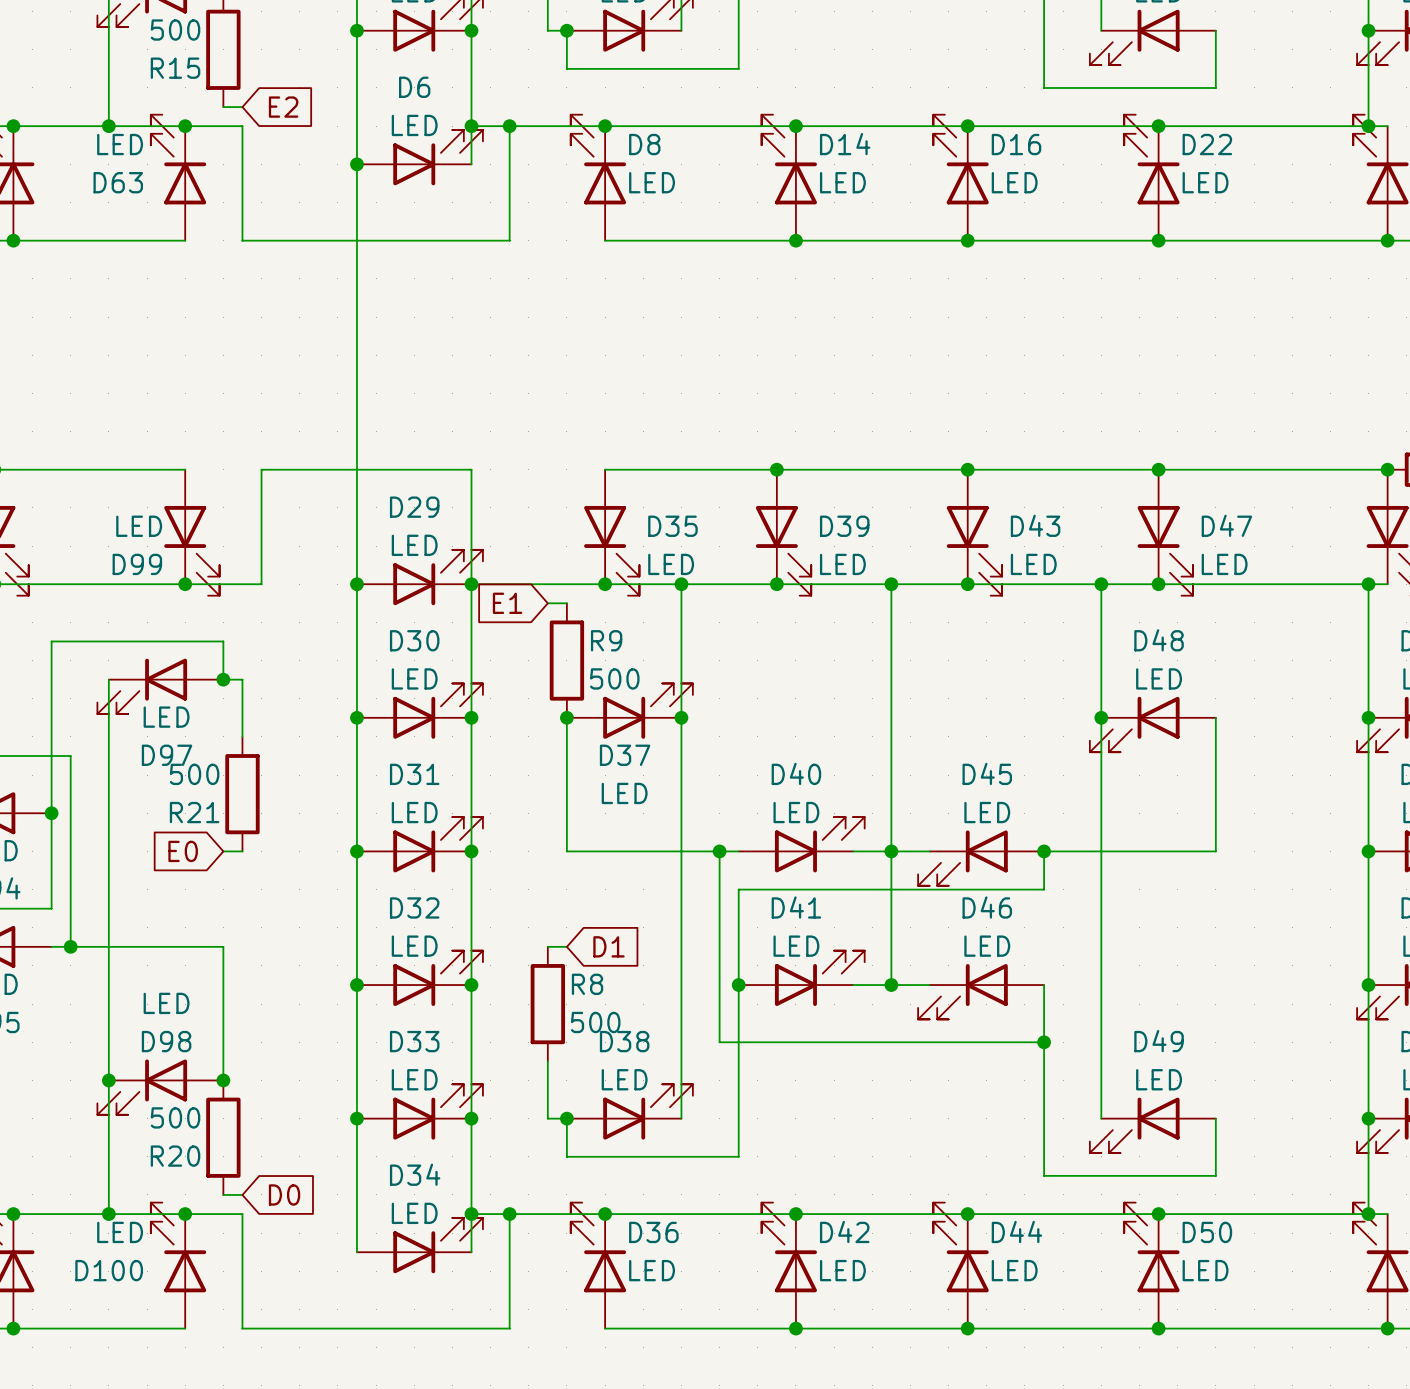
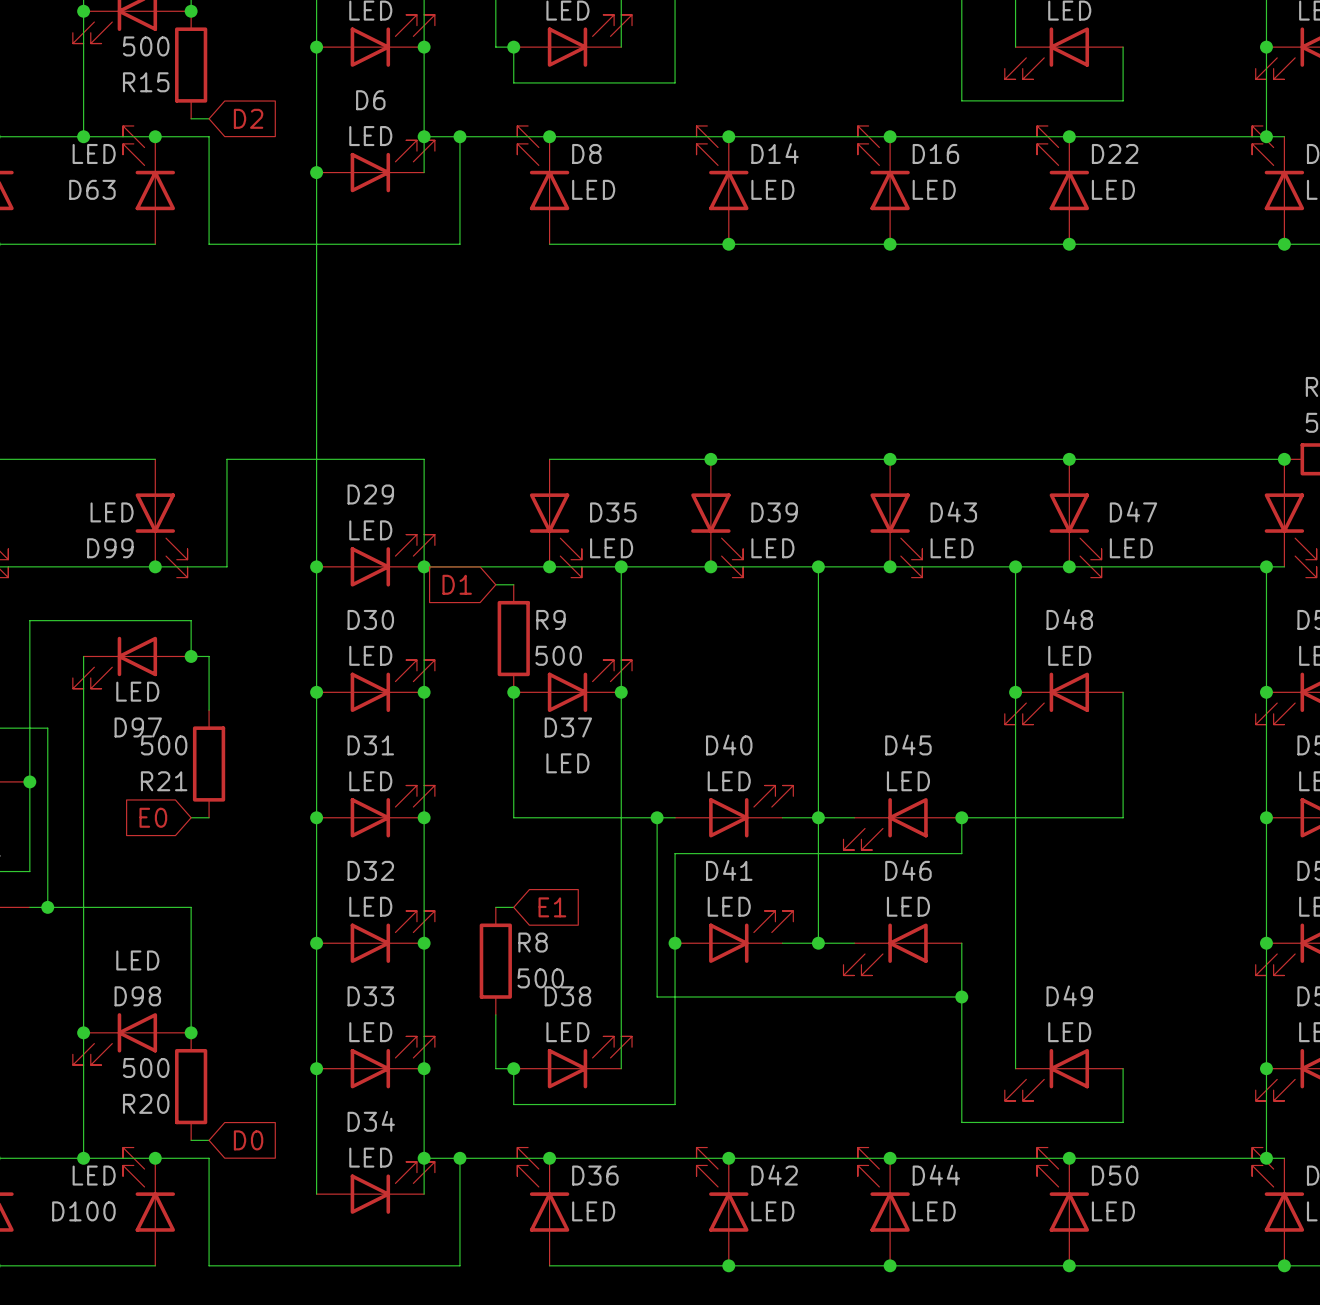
global label: E2 (283, 107) -> D2 (248, 118)
global label: E1 (507, 603) -> D1 (457, 584)
global label: D1 (608, 946) -> E1 (552, 907)

